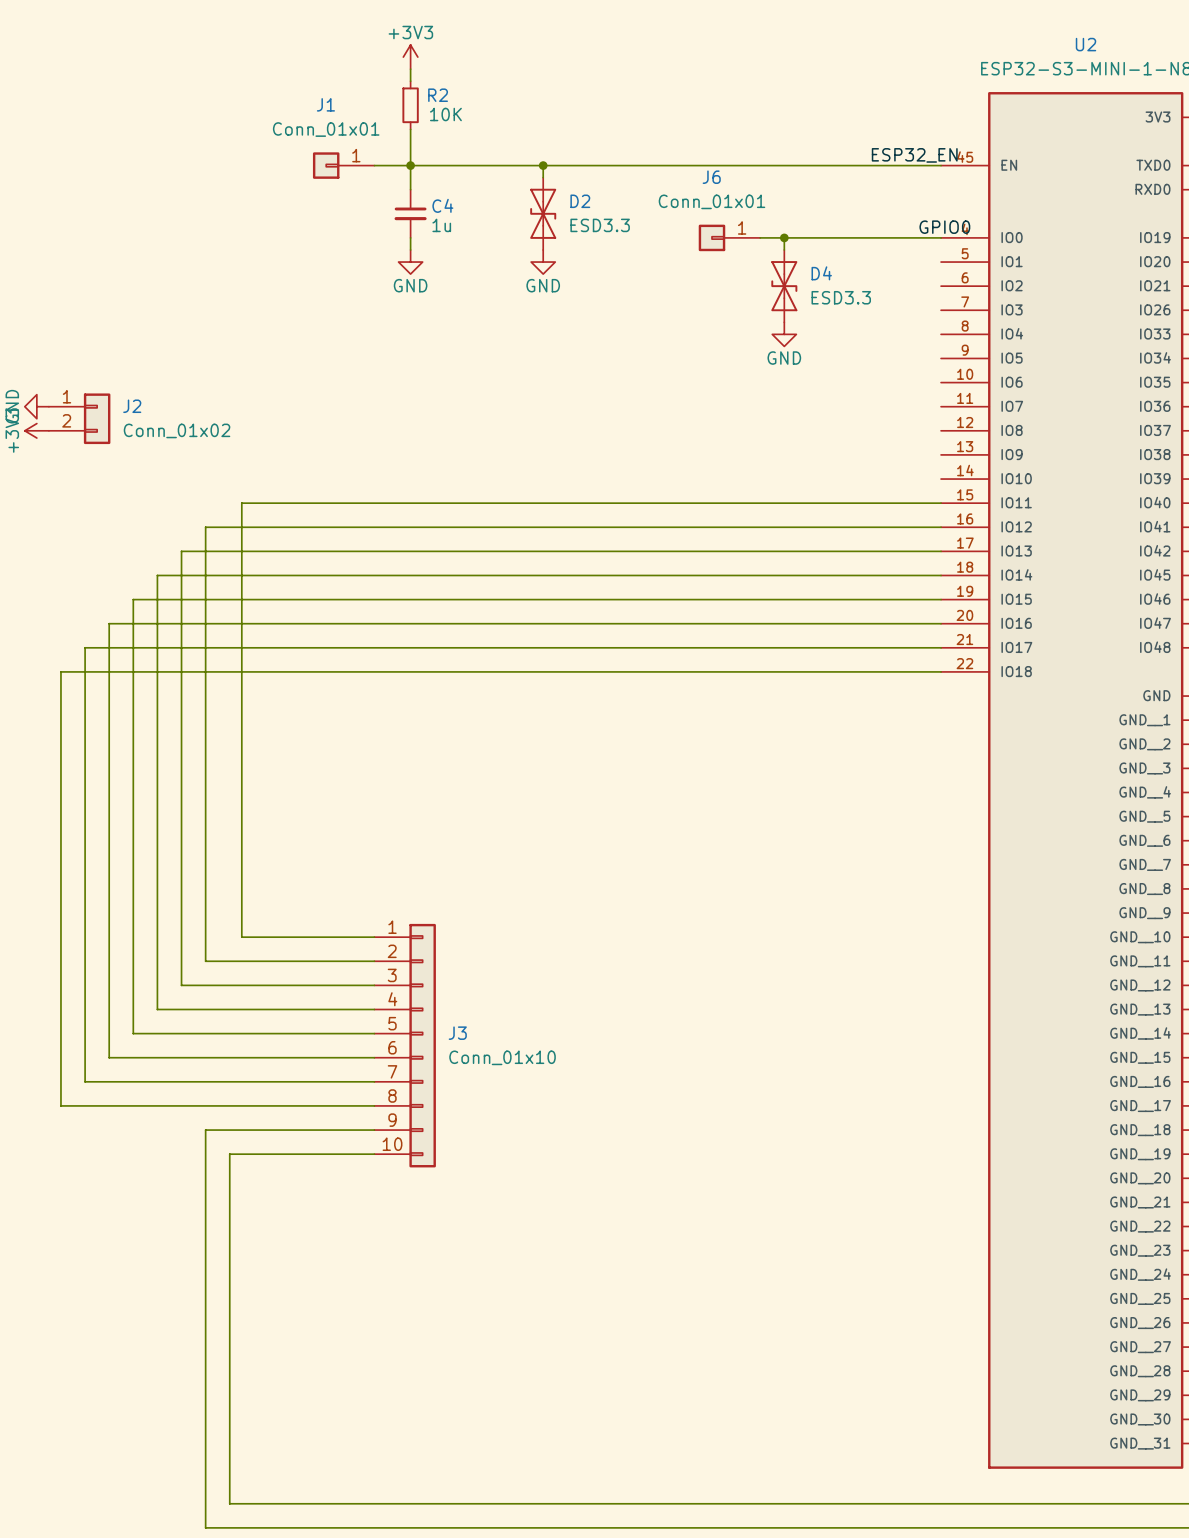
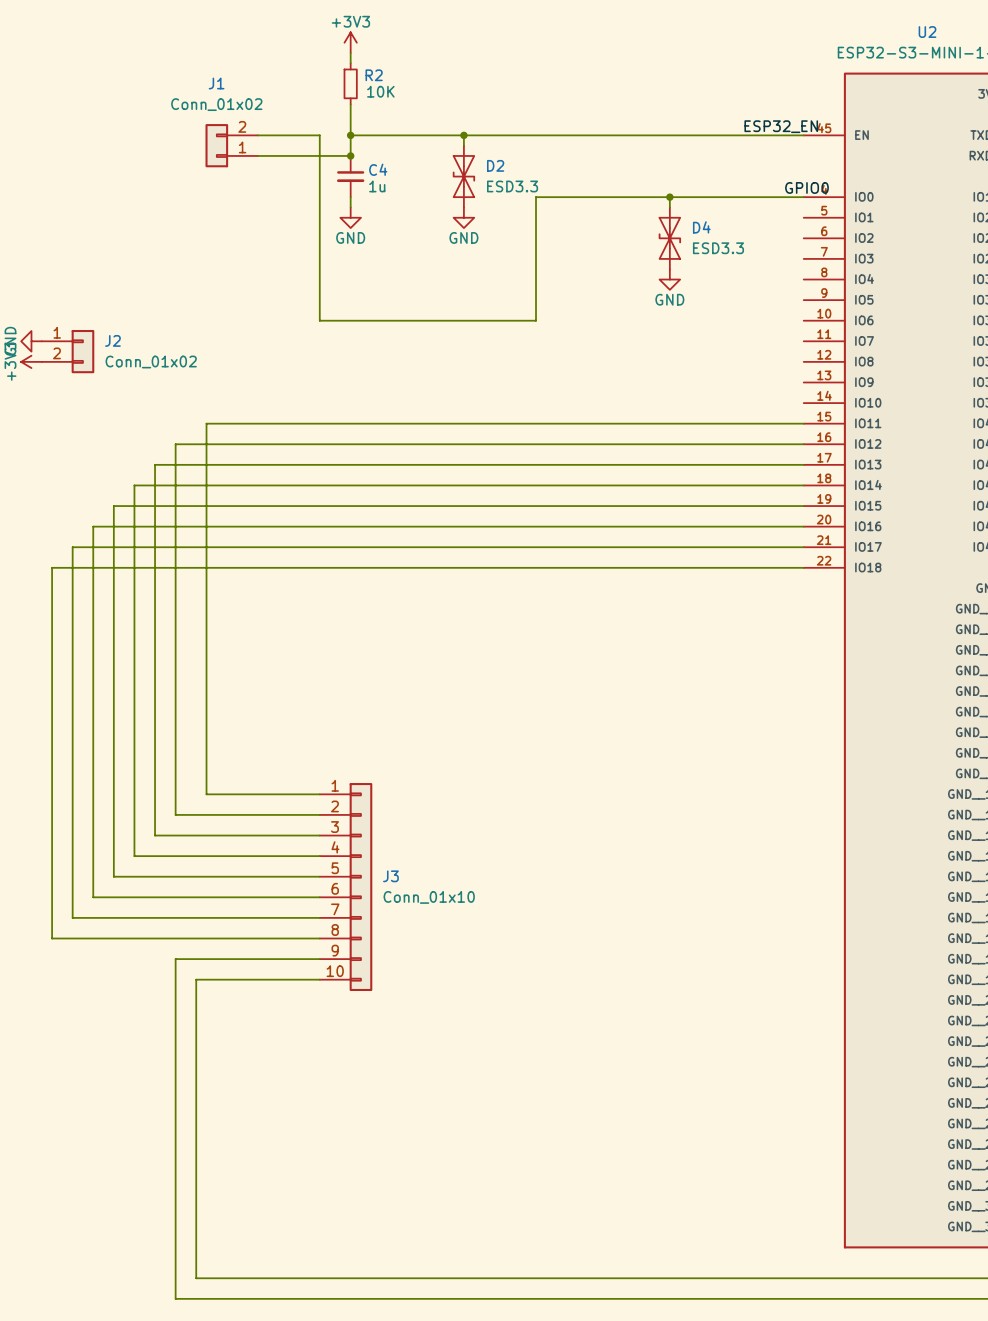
J1 value: Conn_01x01 (326, 129) -> Conn_01x02 (216, 104)
J1 symbol: [312, 152, 375, 179] -> [205, 124, 259, 168]
wire: none -> (258, 135) (319, 135) (319, 320) (536, 320) (536, 197) (649, 197)
wire: (374, 165) (410, 165) -> none
wire: none -> (258, 155) (350, 155)
junction: none -> (350, 155)
J6: Conn_01x01 (729, 237) -> none

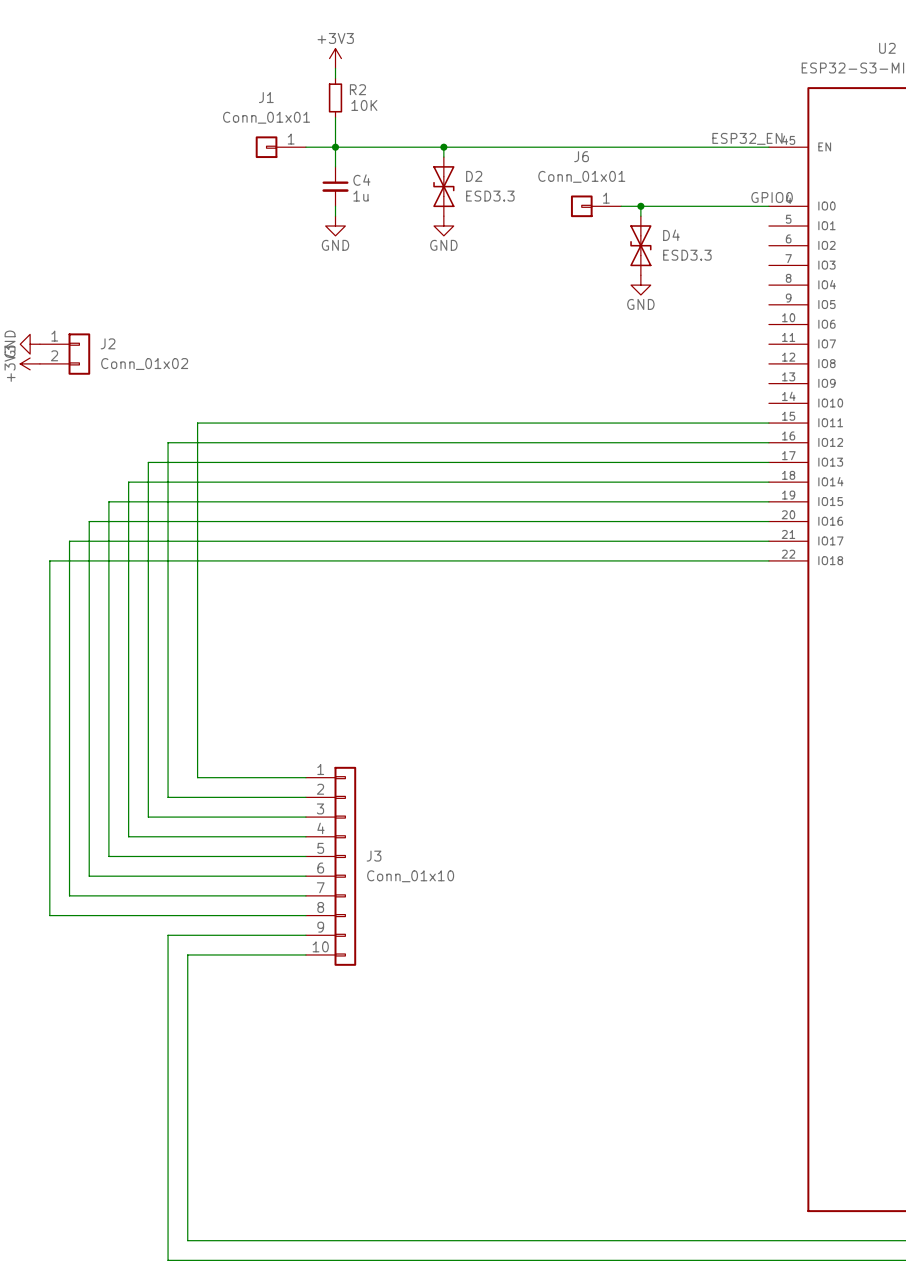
J1 value: Conn_01x02 (216, 104) -> Conn_01x01 (266, 117)
J1 symbol: [205, 124, 259, 168] -> [255, 136, 306, 159]
wire: (258, 135) (319, 135) (319, 320) (536, 320) (536, 197) (649, 197) -> none
wire: none -> (305, 147) (335, 147)
wire: (258, 155) (350, 155) -> none
junction: (350, 155) -> none
J6: none -> Conn_01x01 (596, 206)

